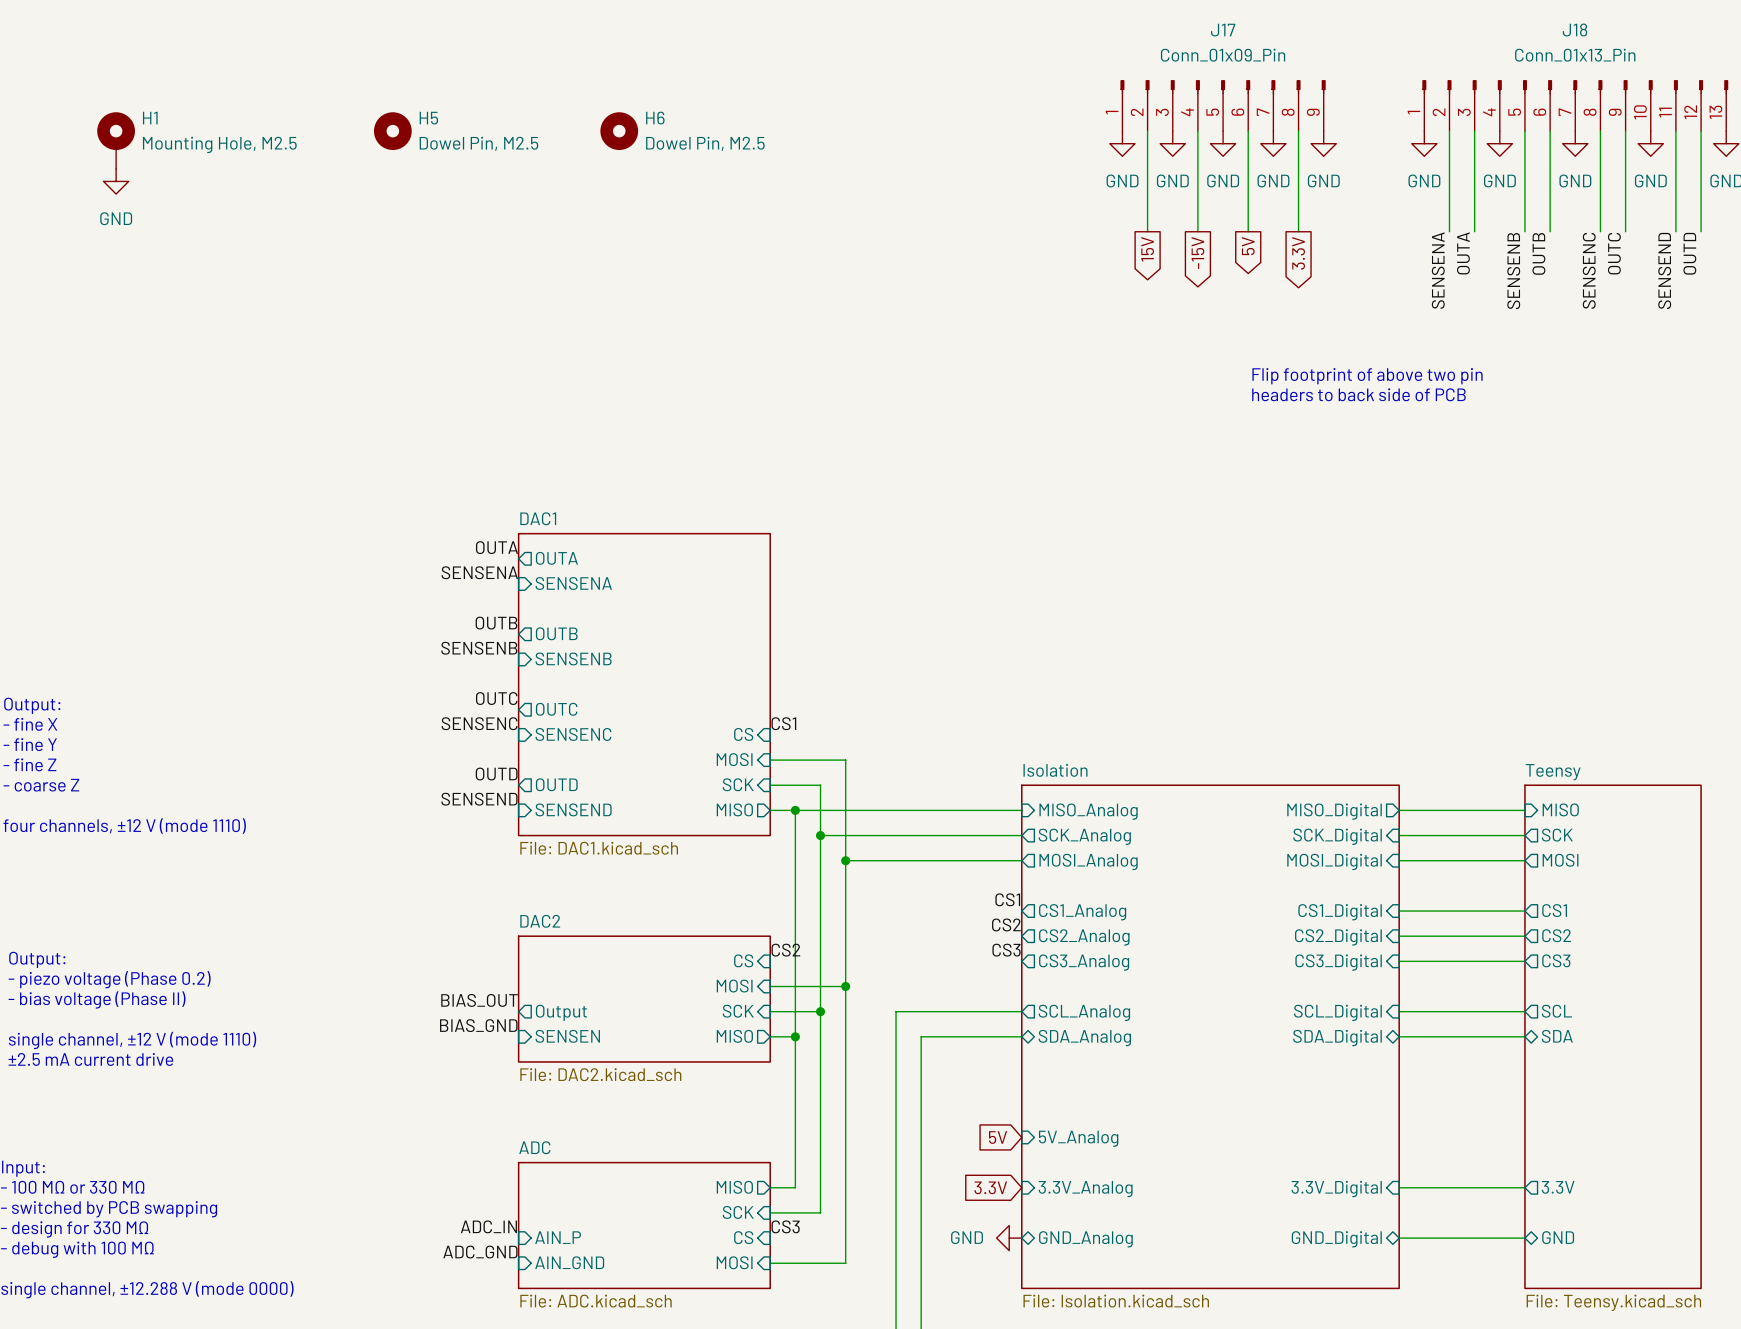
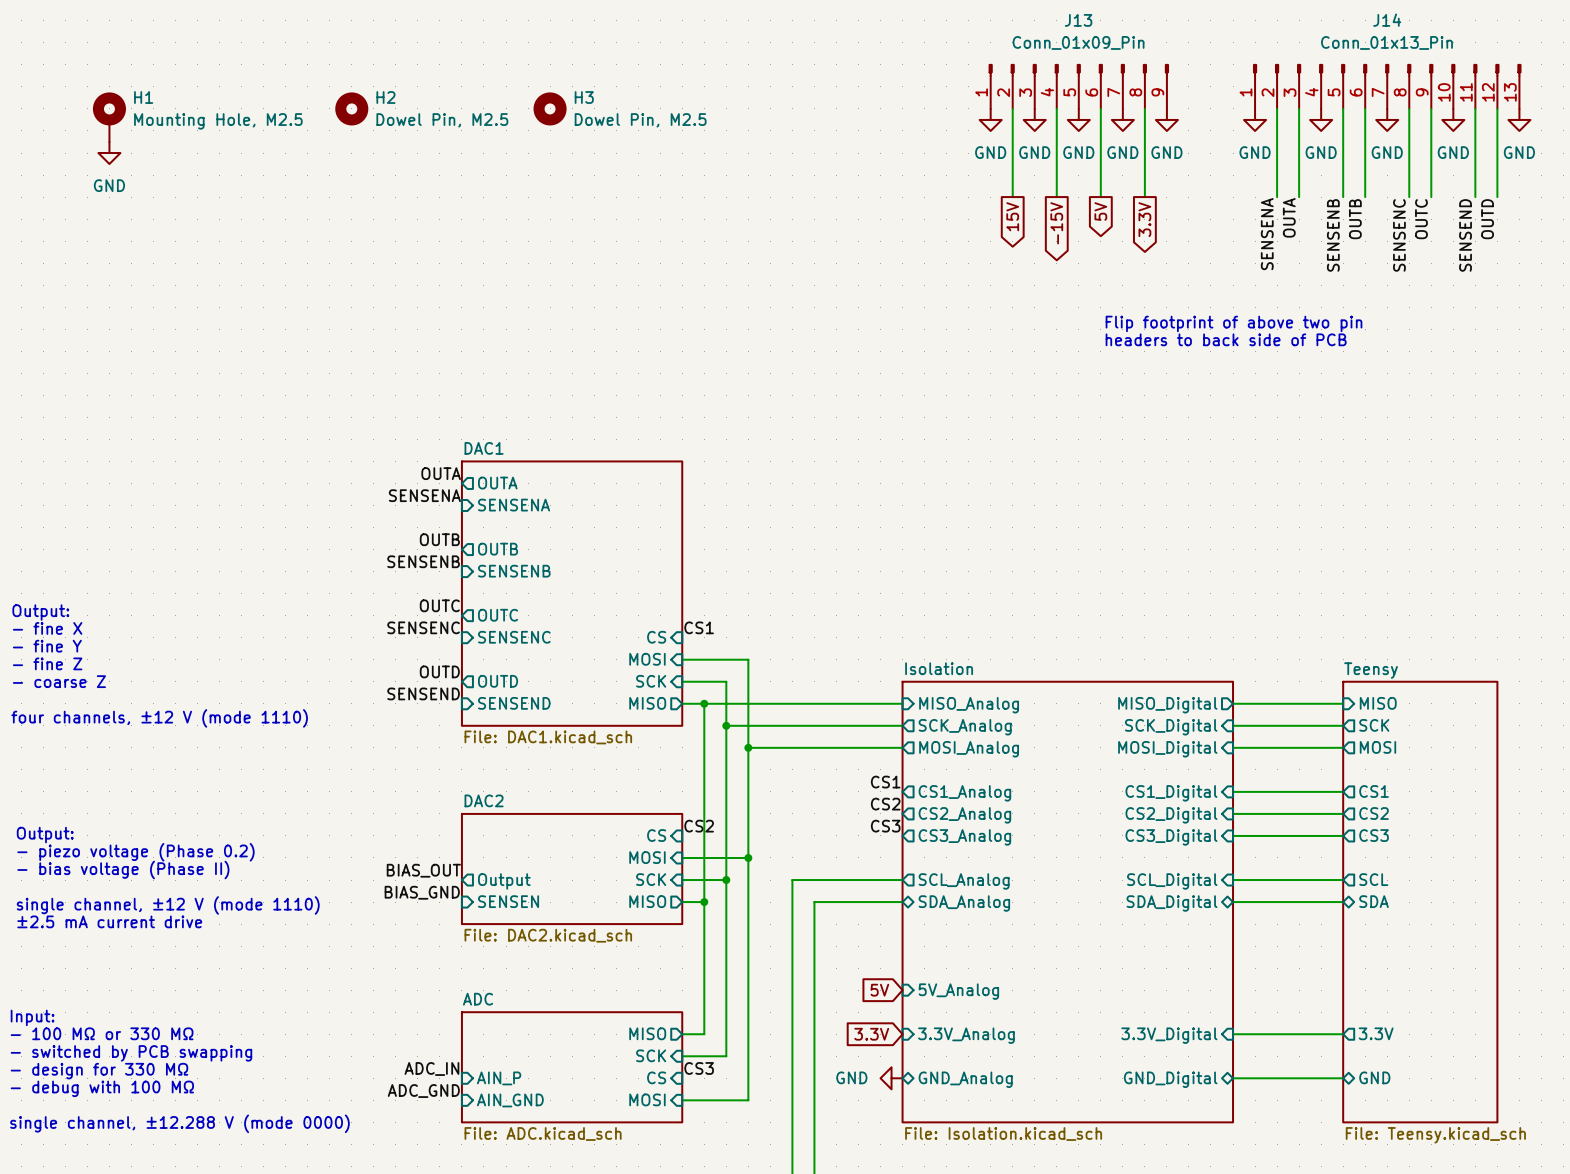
J17 name: J17 (1223, 30) -> J13 (1078, 20)
J18 name: J18 (1575, 30) -> J14 (1387, 20)
H5 name: H5 (428, 118) -> H2 (385, 97)
H6 name: H6 (655, 118) -> H3 (584, 97)

